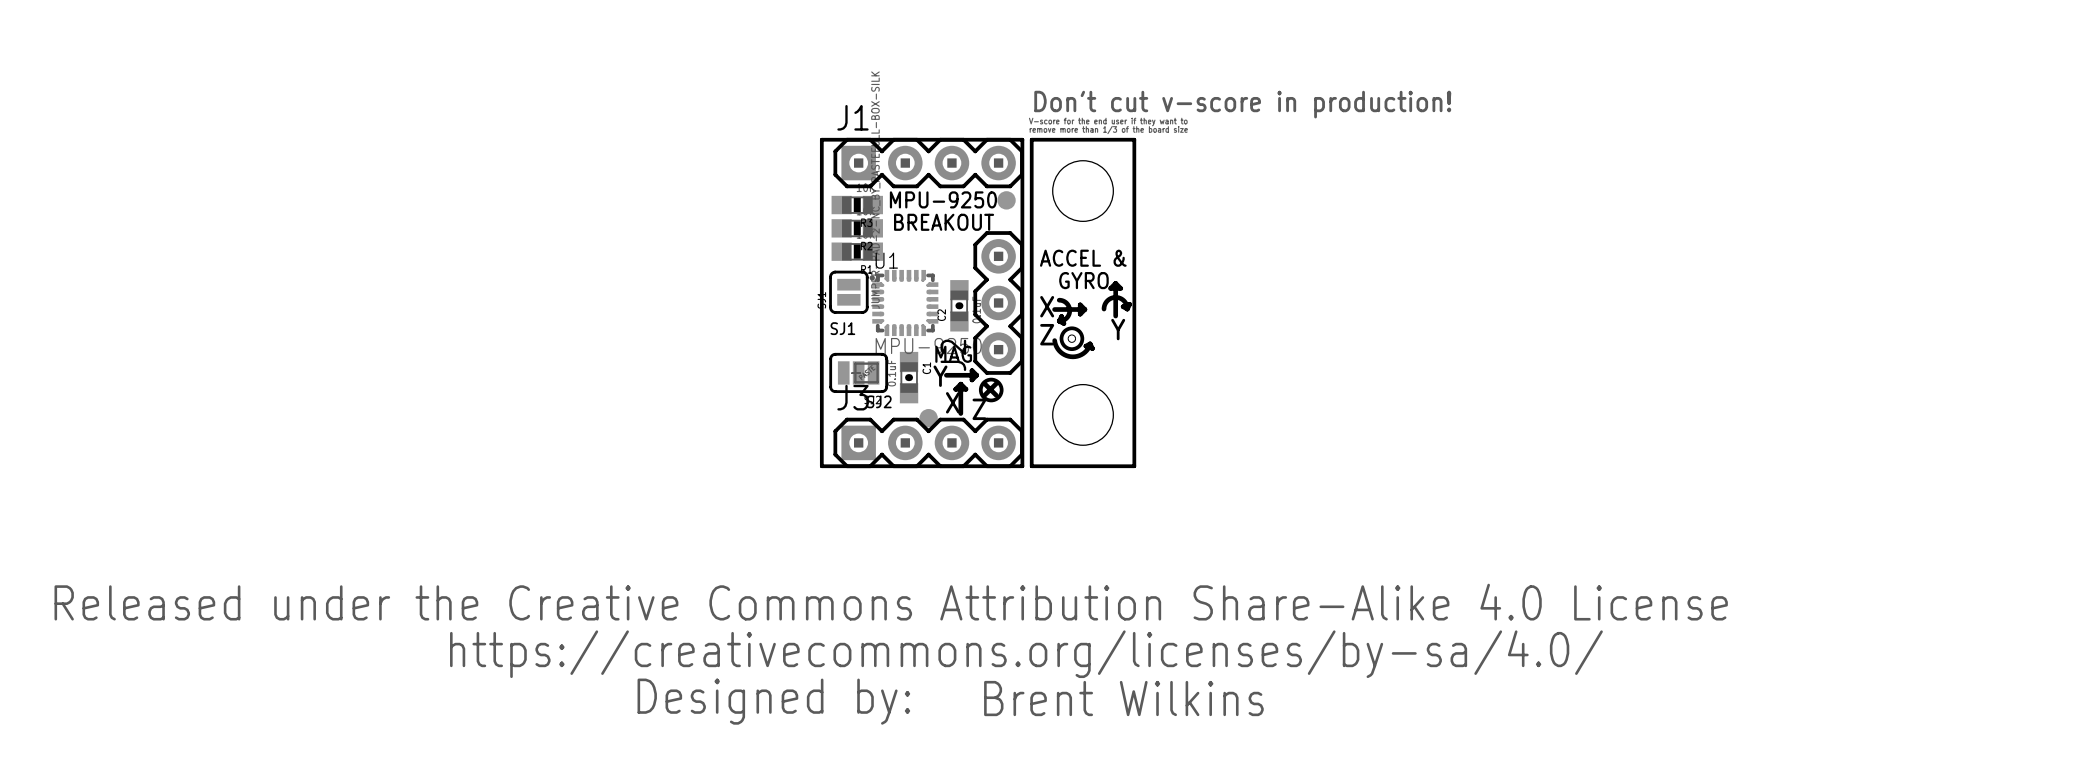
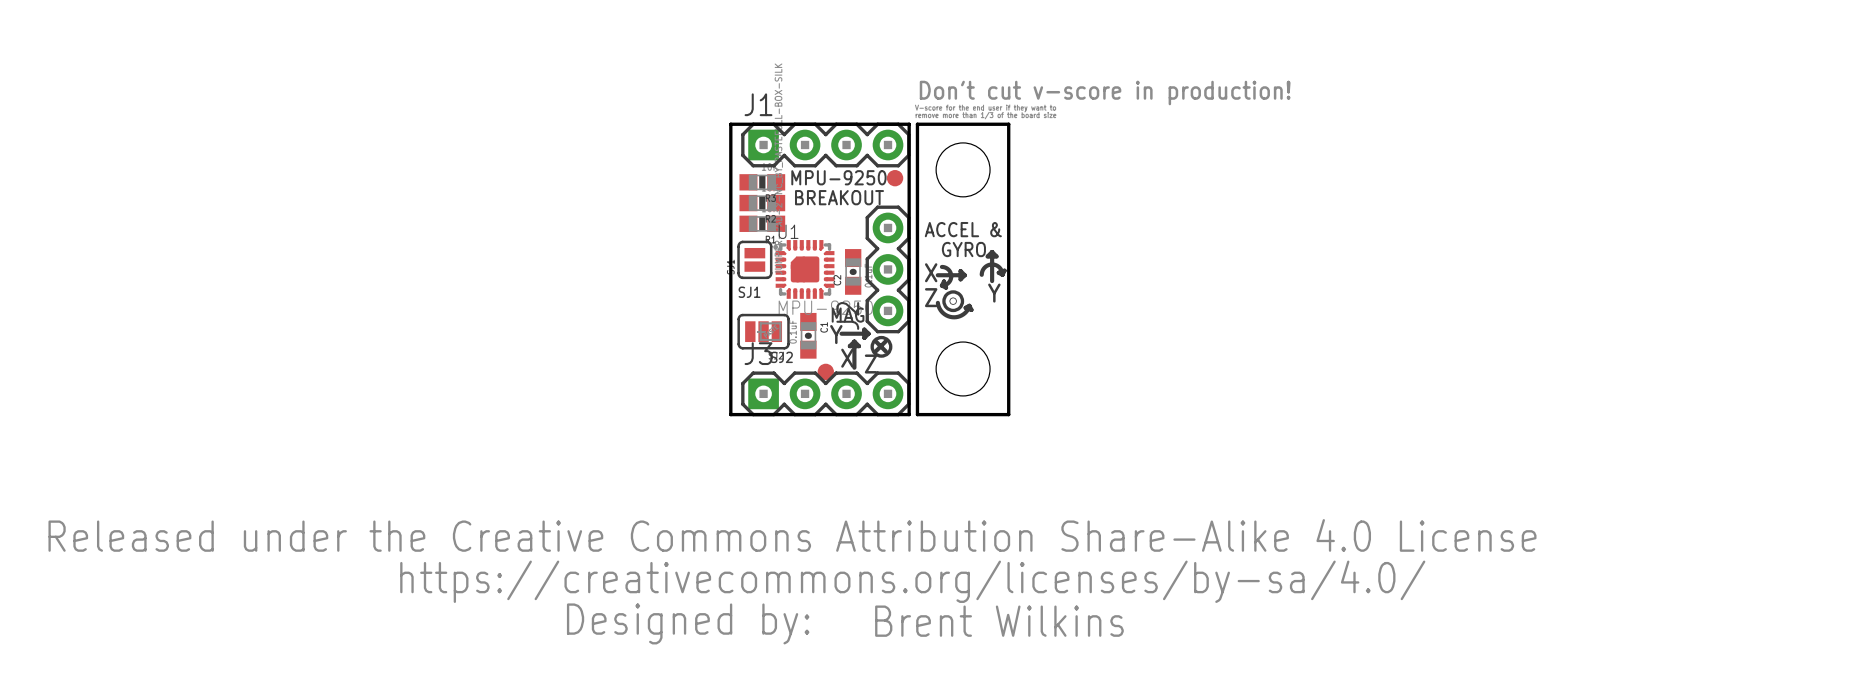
U1 footprint: [869, 269, 939, 337] -> [773, 240, 835, 299]

